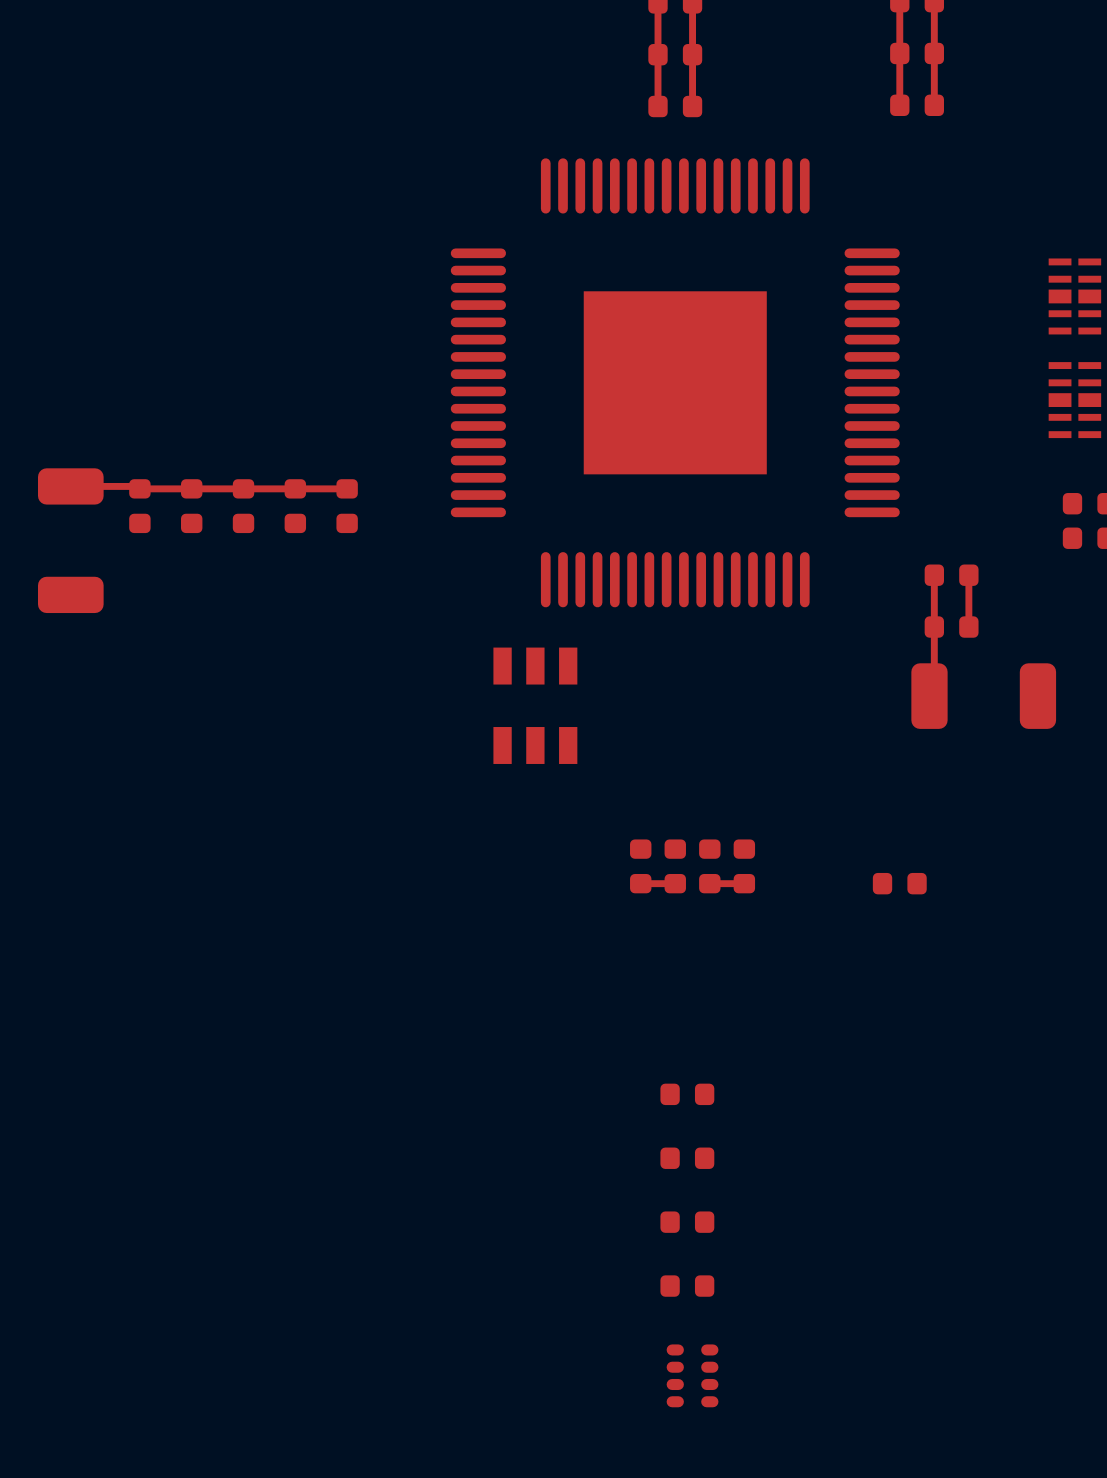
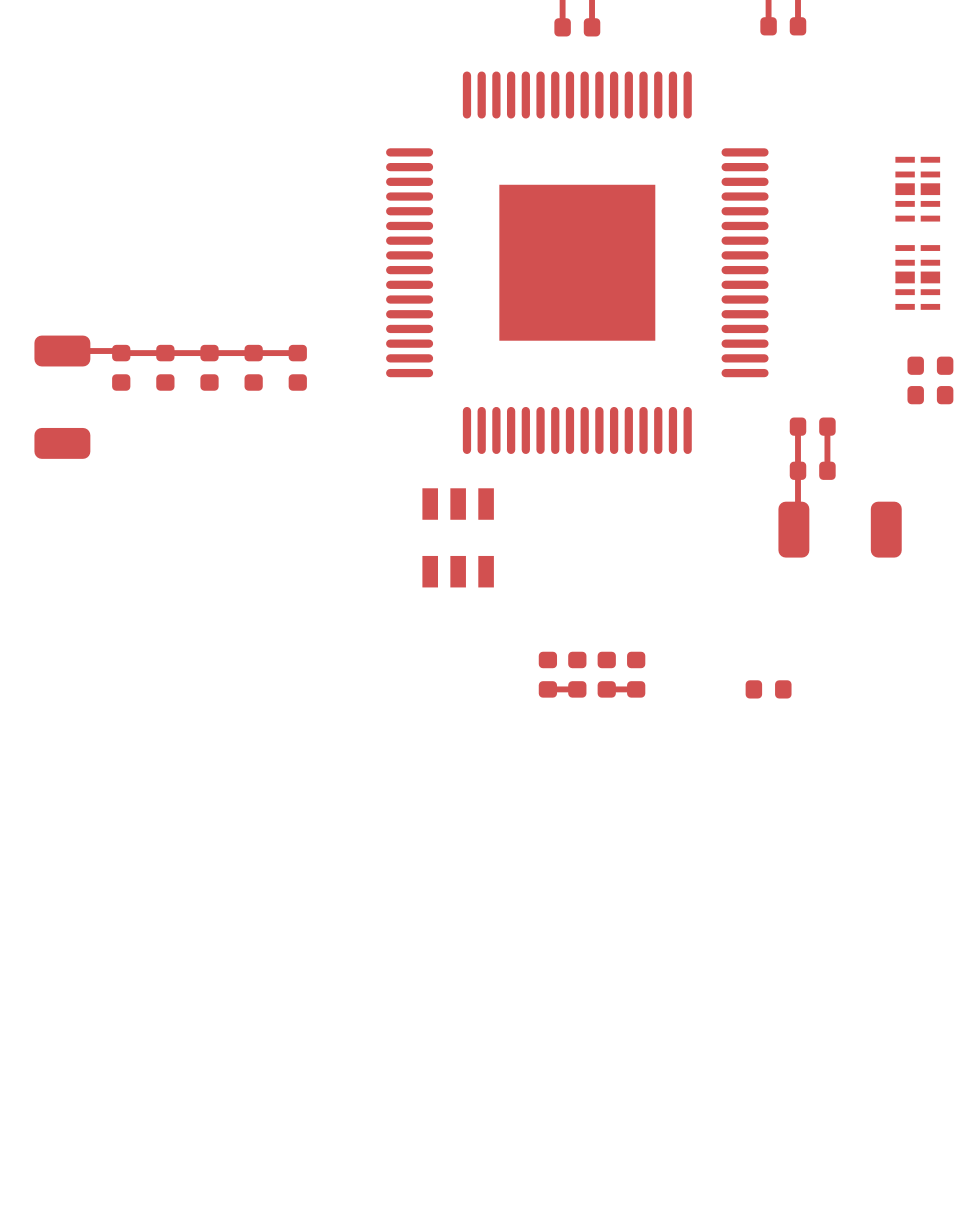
part: (687, 1094) -> none
part: (687, 1158) -> none
part: (687, 1222) -> none
part: (687, 1286) -> none
part: (692, 1375) -> none

